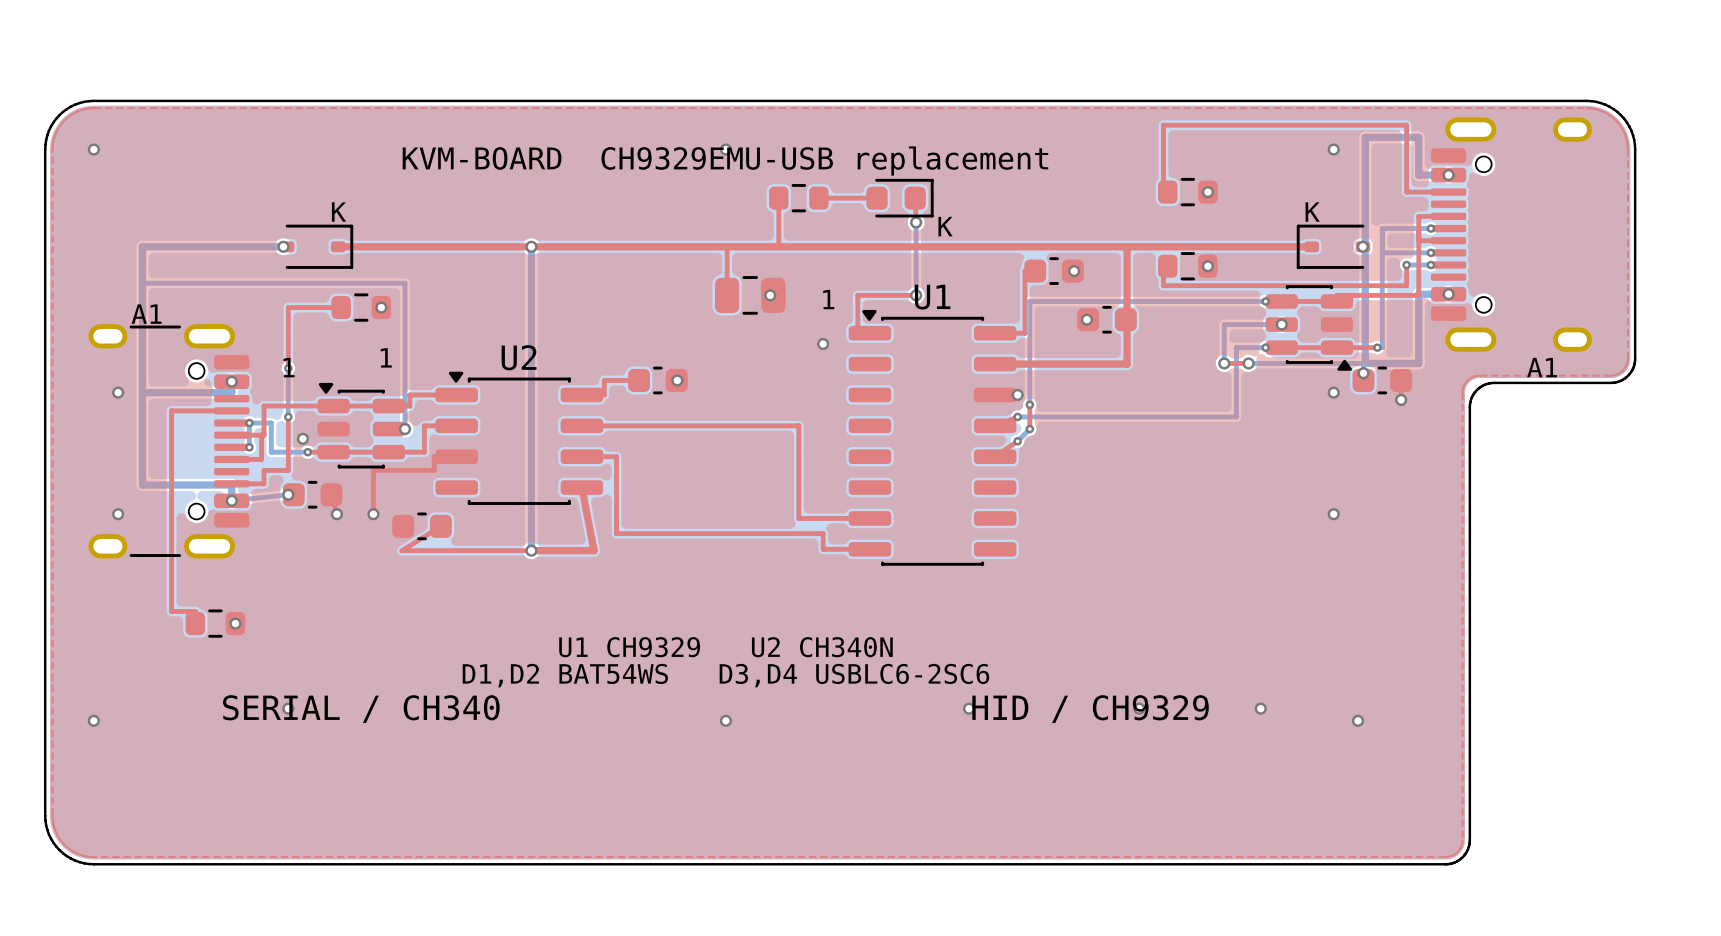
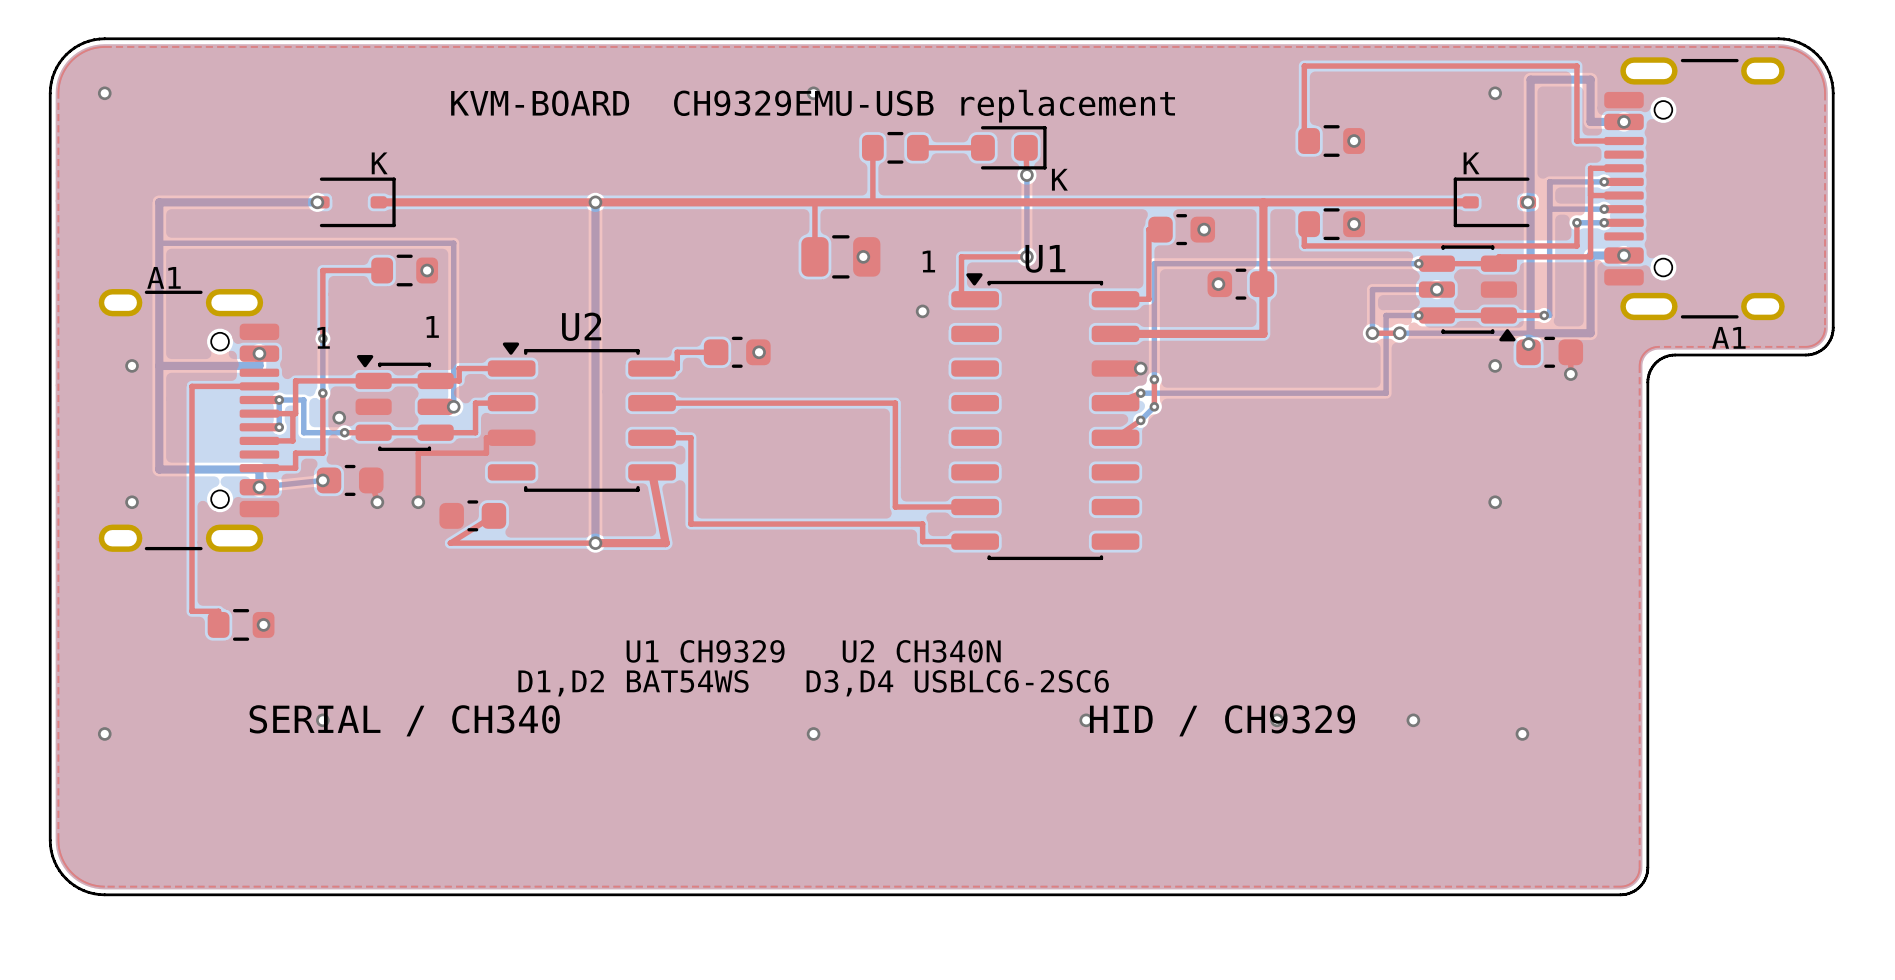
part footprint: [1430, 117, 1592, 352] -> [1604, 57, 1785, 321]

